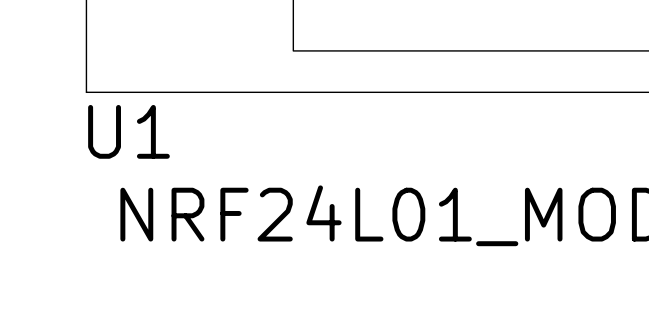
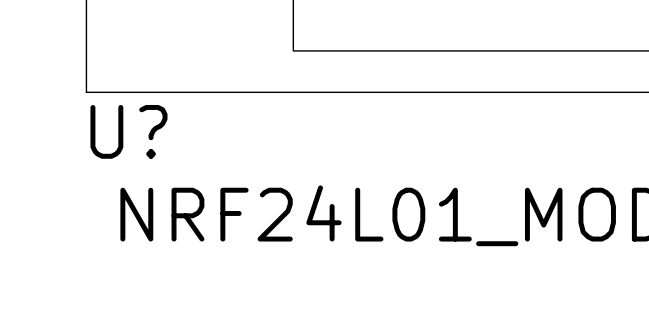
U1 name: U1 (128, 131) -> U? (128, 131)

